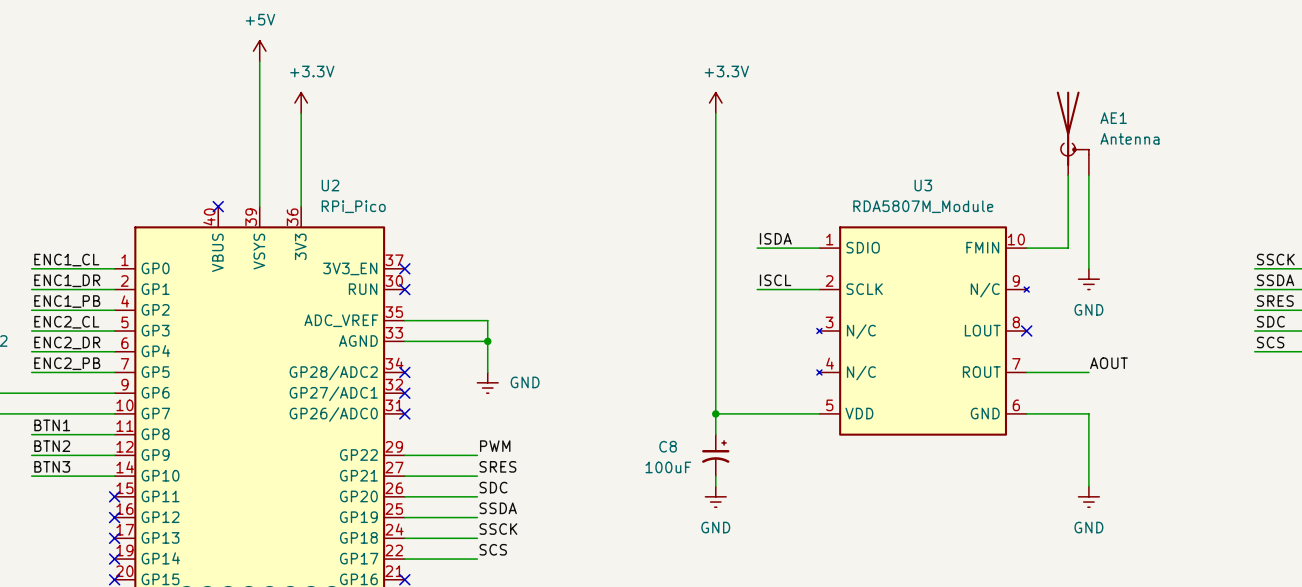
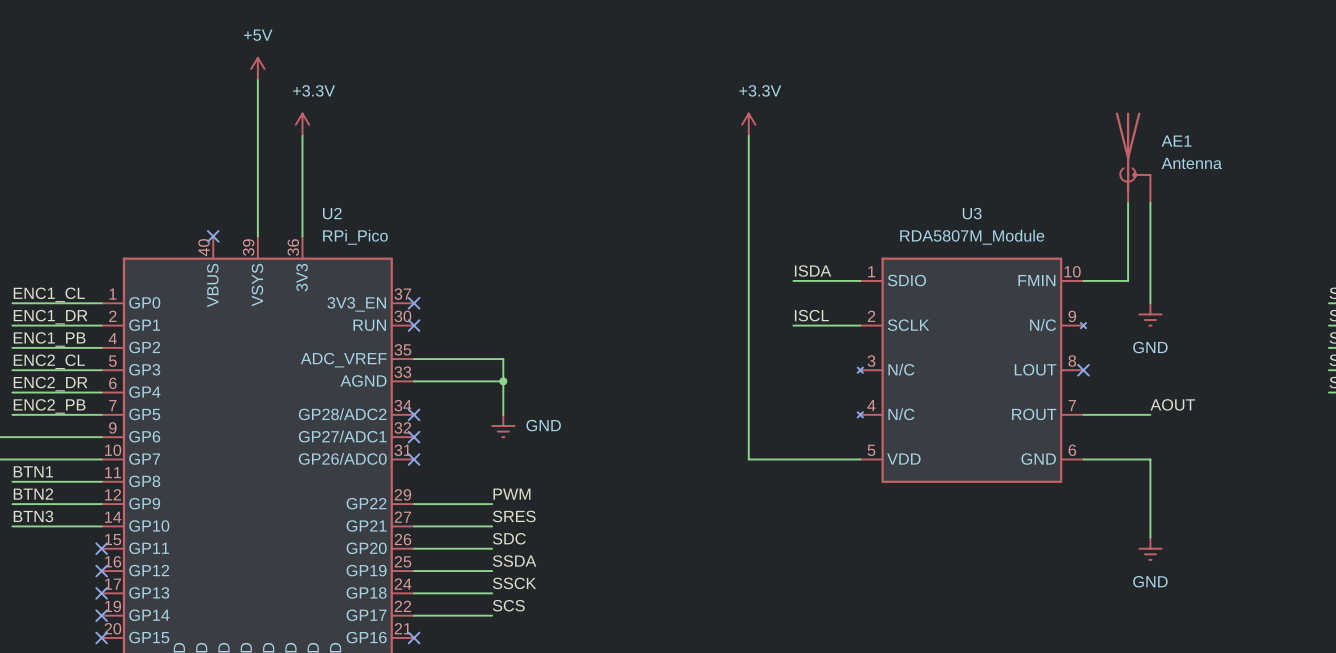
wire: (715, 413) (715, 434) -> none
junction: (715, 413) -> none
C8: 100uF (715, 455) -> none
wire: (715, 476) (715, 486) -> none
power symbol: GND (715, 496) -> none

